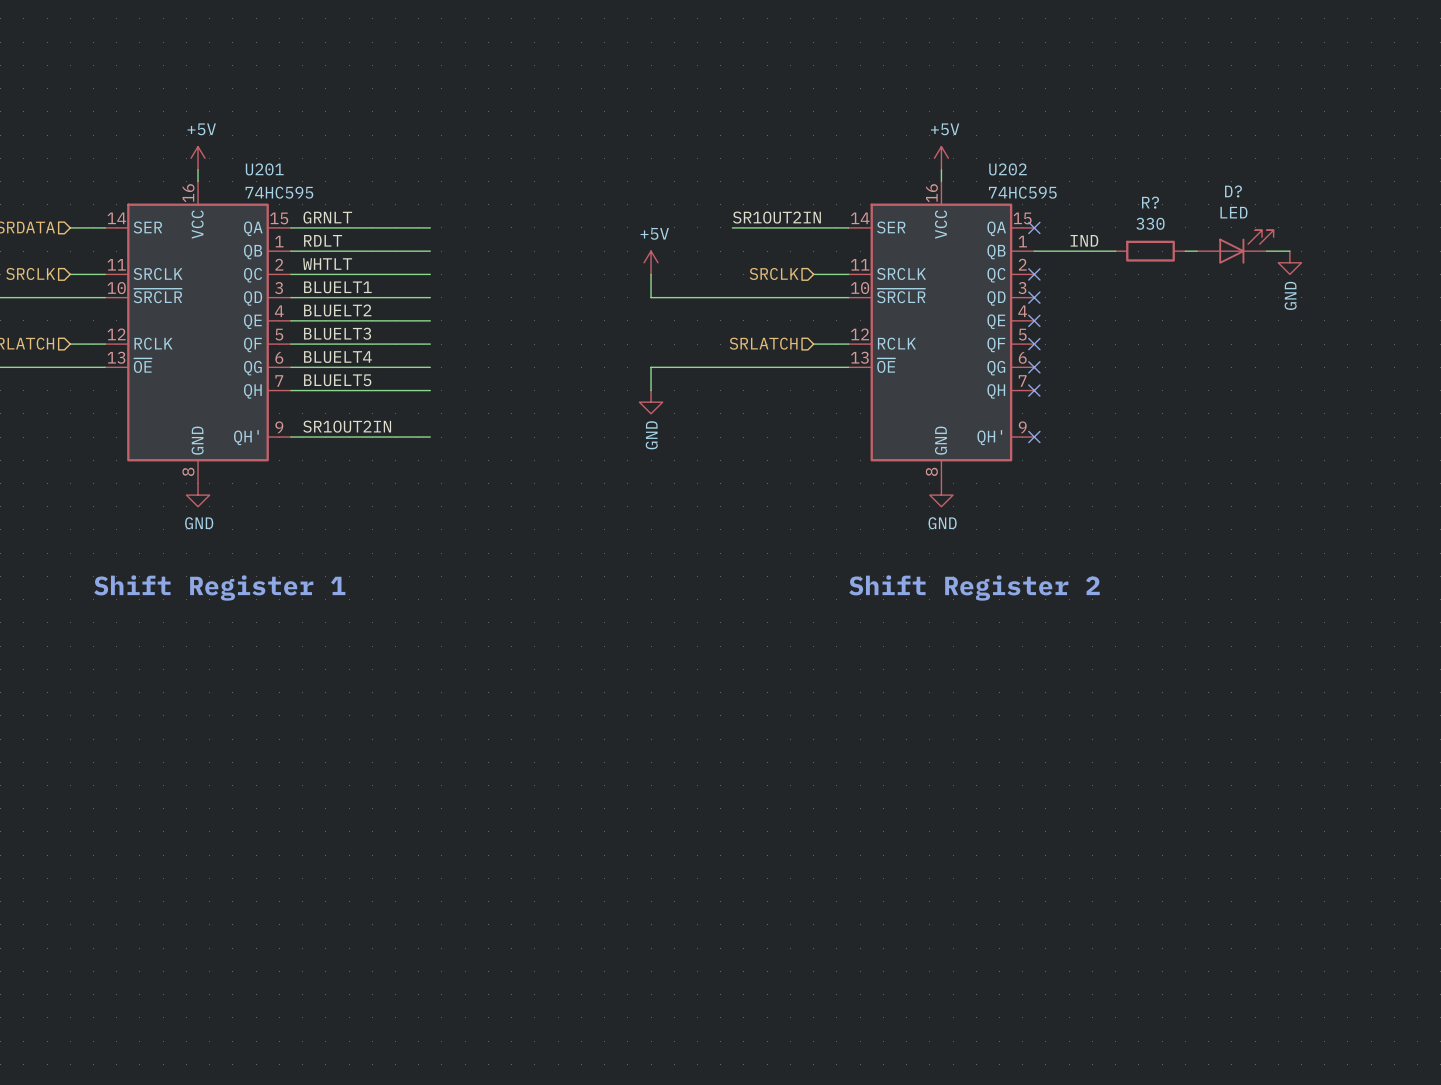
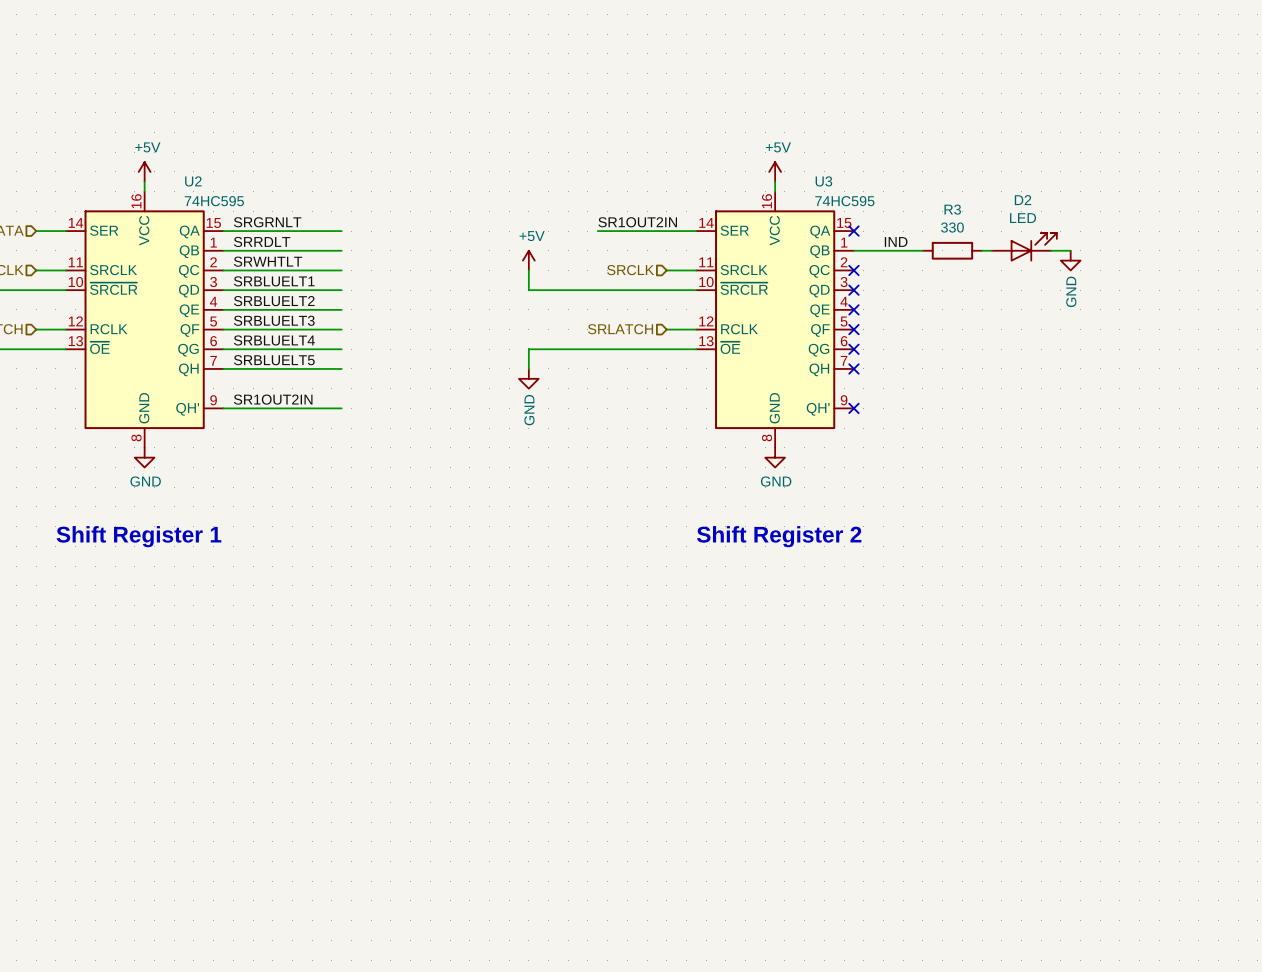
U201 name: U201 (264, 169) -> U2 (193, 181)
U202 name: U202 (1008, 169) -> U3 (823, 181)
D? name: D? (1233, 191) -> D2 (1023, 200)
R? name: R? (1150, 202) -> R3 (952, 209)
label: GRNLT (327, 217) -> SRGRNLT (267, 222)
label: RDLT (323, 240) -> SRRDLT (262, 241)
label: WHTLT (327, 264) -> SRWHTLT (268, 261)
label: BLUELT1 (337, 287) -> SRBLUELT1 (274, 281)
label: BLUELT2 (337, 310) -> SRBLUELT2 (274, 301)
label: BLUELT3 (337, 333) -> SRBLUELT3 (274, 320)
label: BLUELT4 (337, 357) -> SRBLUELT4 (274, 340)
label: BLUELT5 (337, 380) -> SRBLUELT5 (274, 360)

